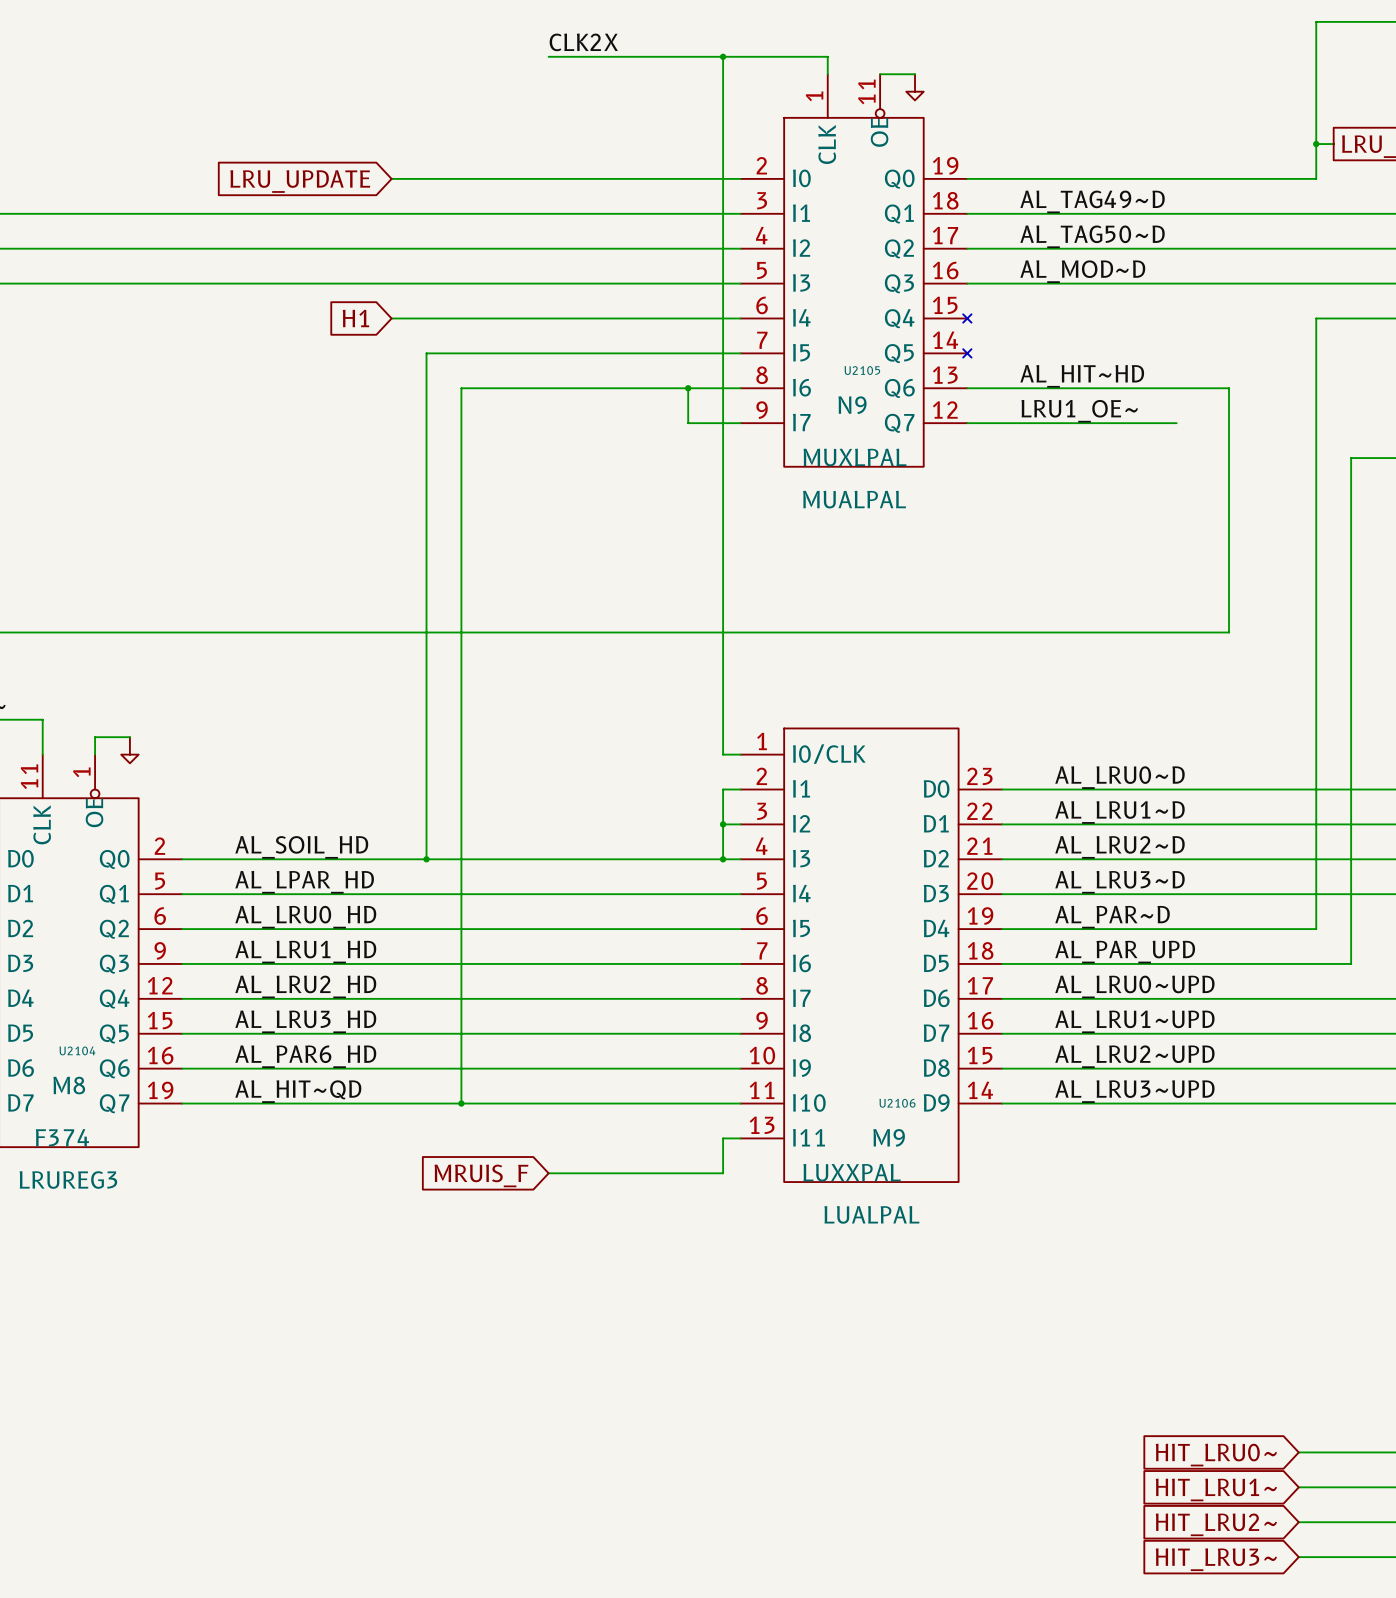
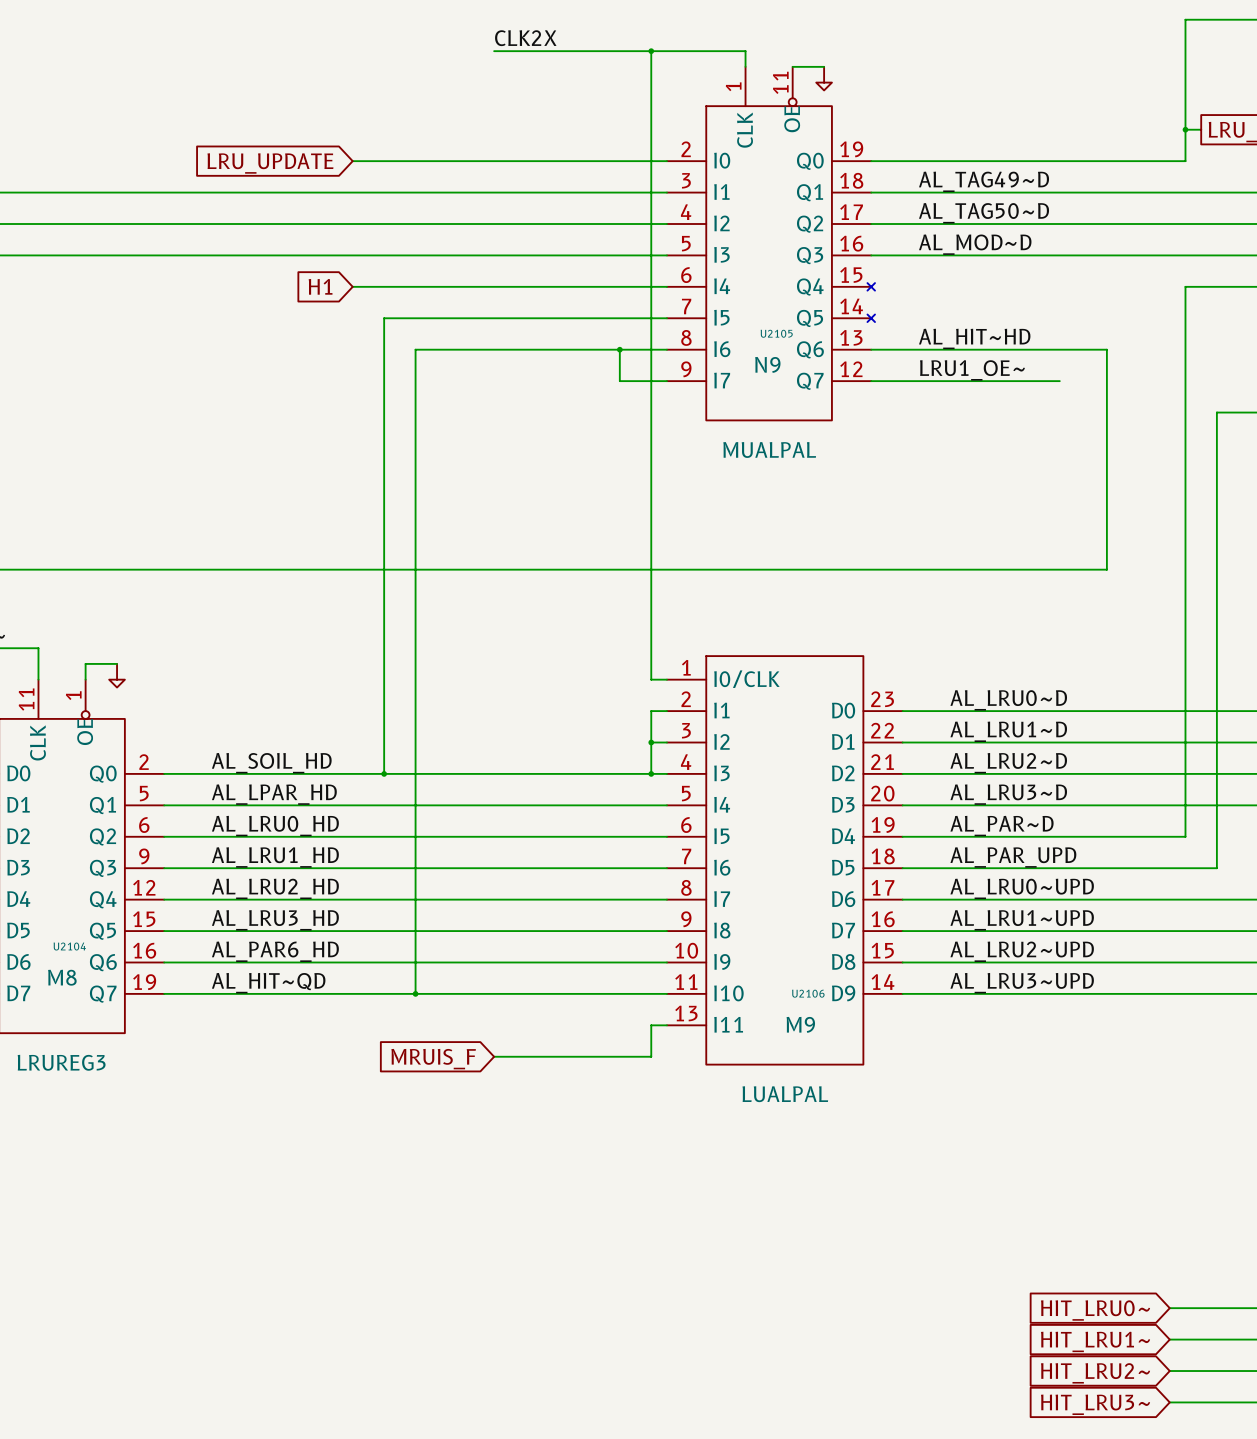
U2105 value: MUXLPAL (855, 457) -> none
U2104 value: F374 (62, 1137) -> none
U2106 value: LUXXPAL (852, 1172) -> none

